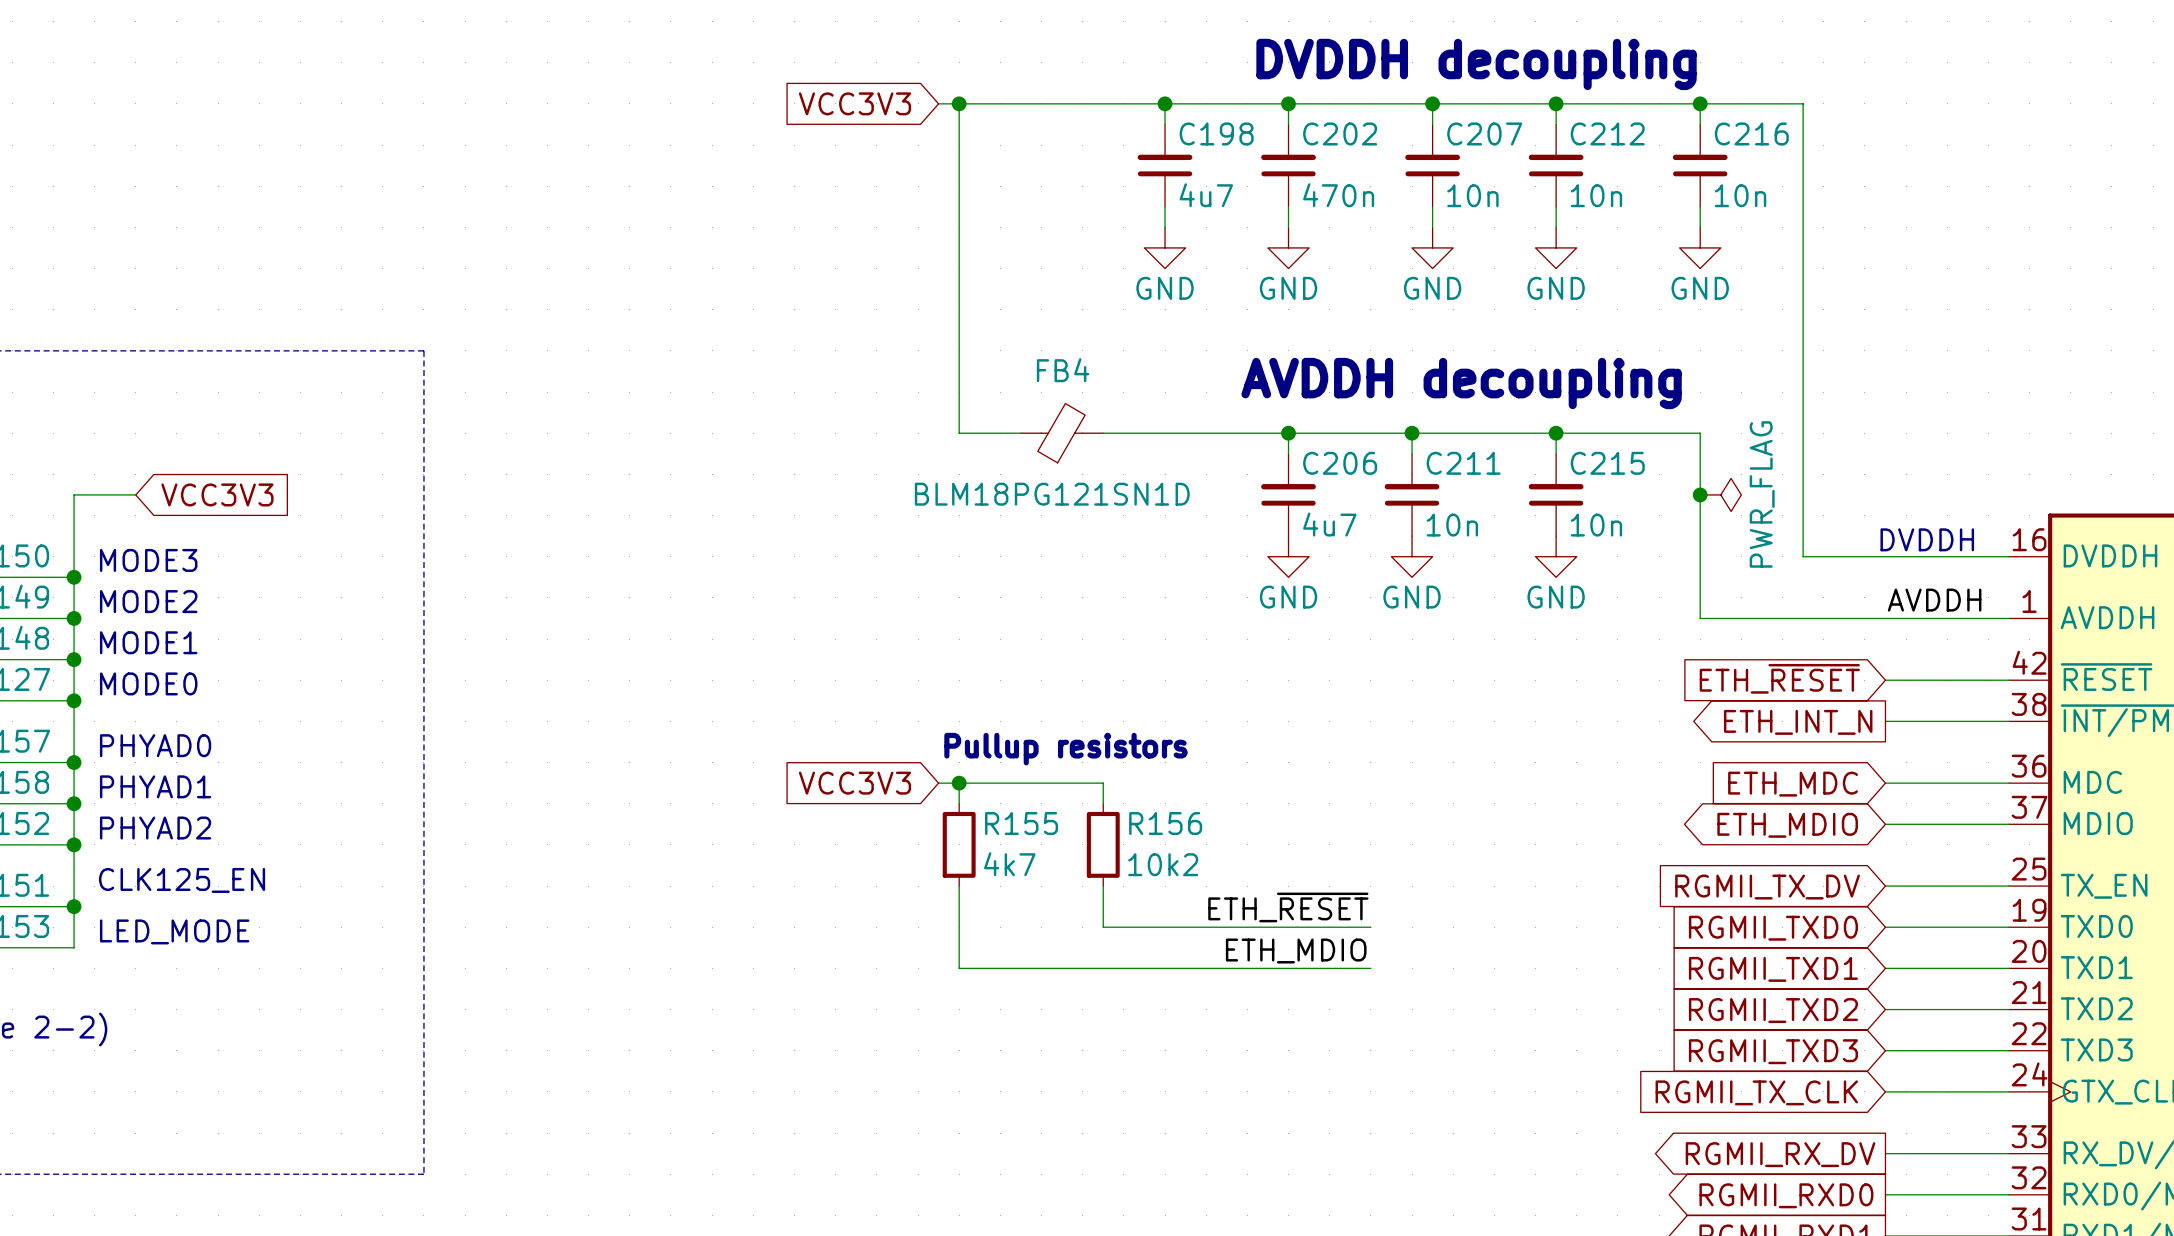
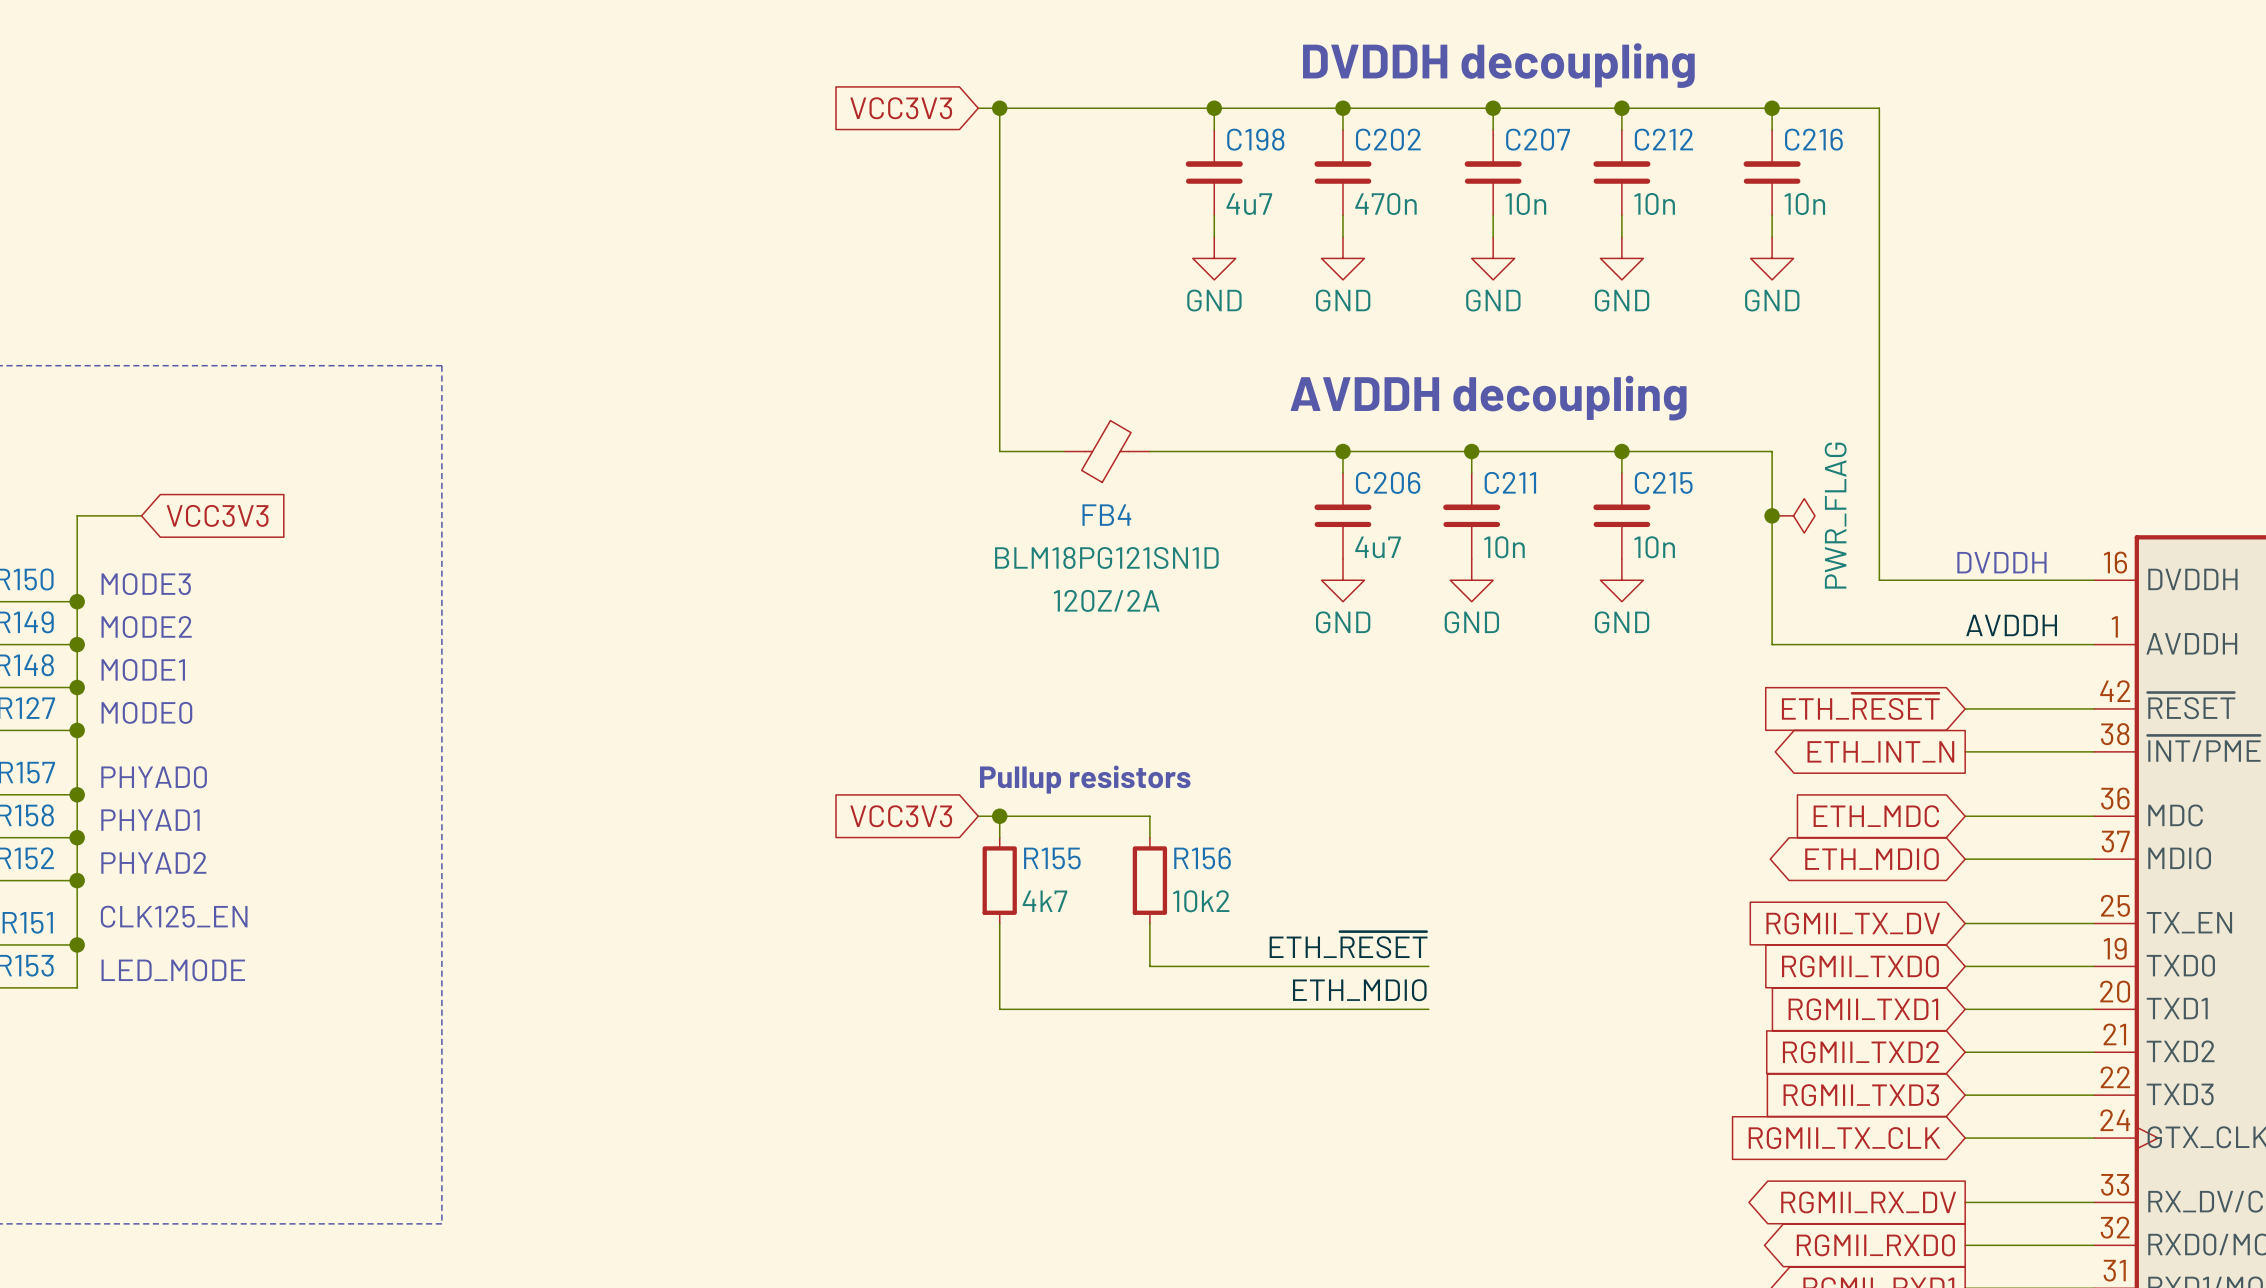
FB4 name position: FB4 (1063, 370) -> FB4 (1106, 515)
FB4 text position: BLM18PG121SN1D (1052, 494) -> BLM18PG121SN1D (1106, 557)
FB4 text: none -> 120Z/2A (1106, 600)

